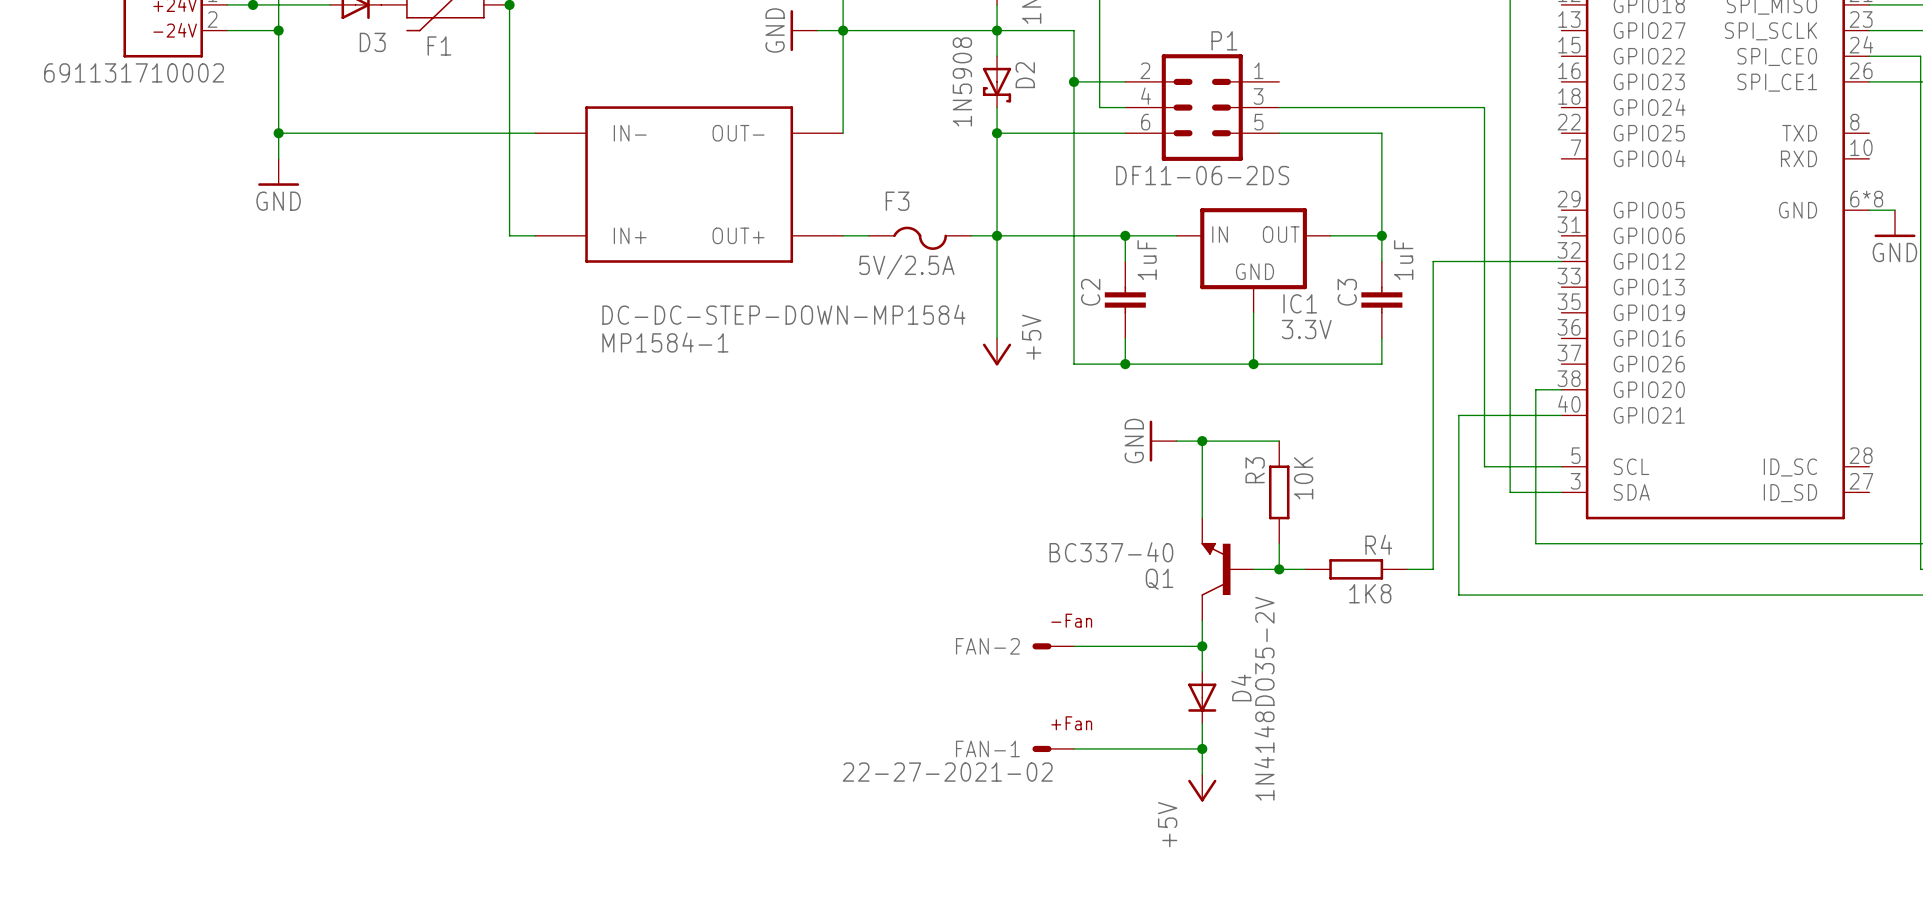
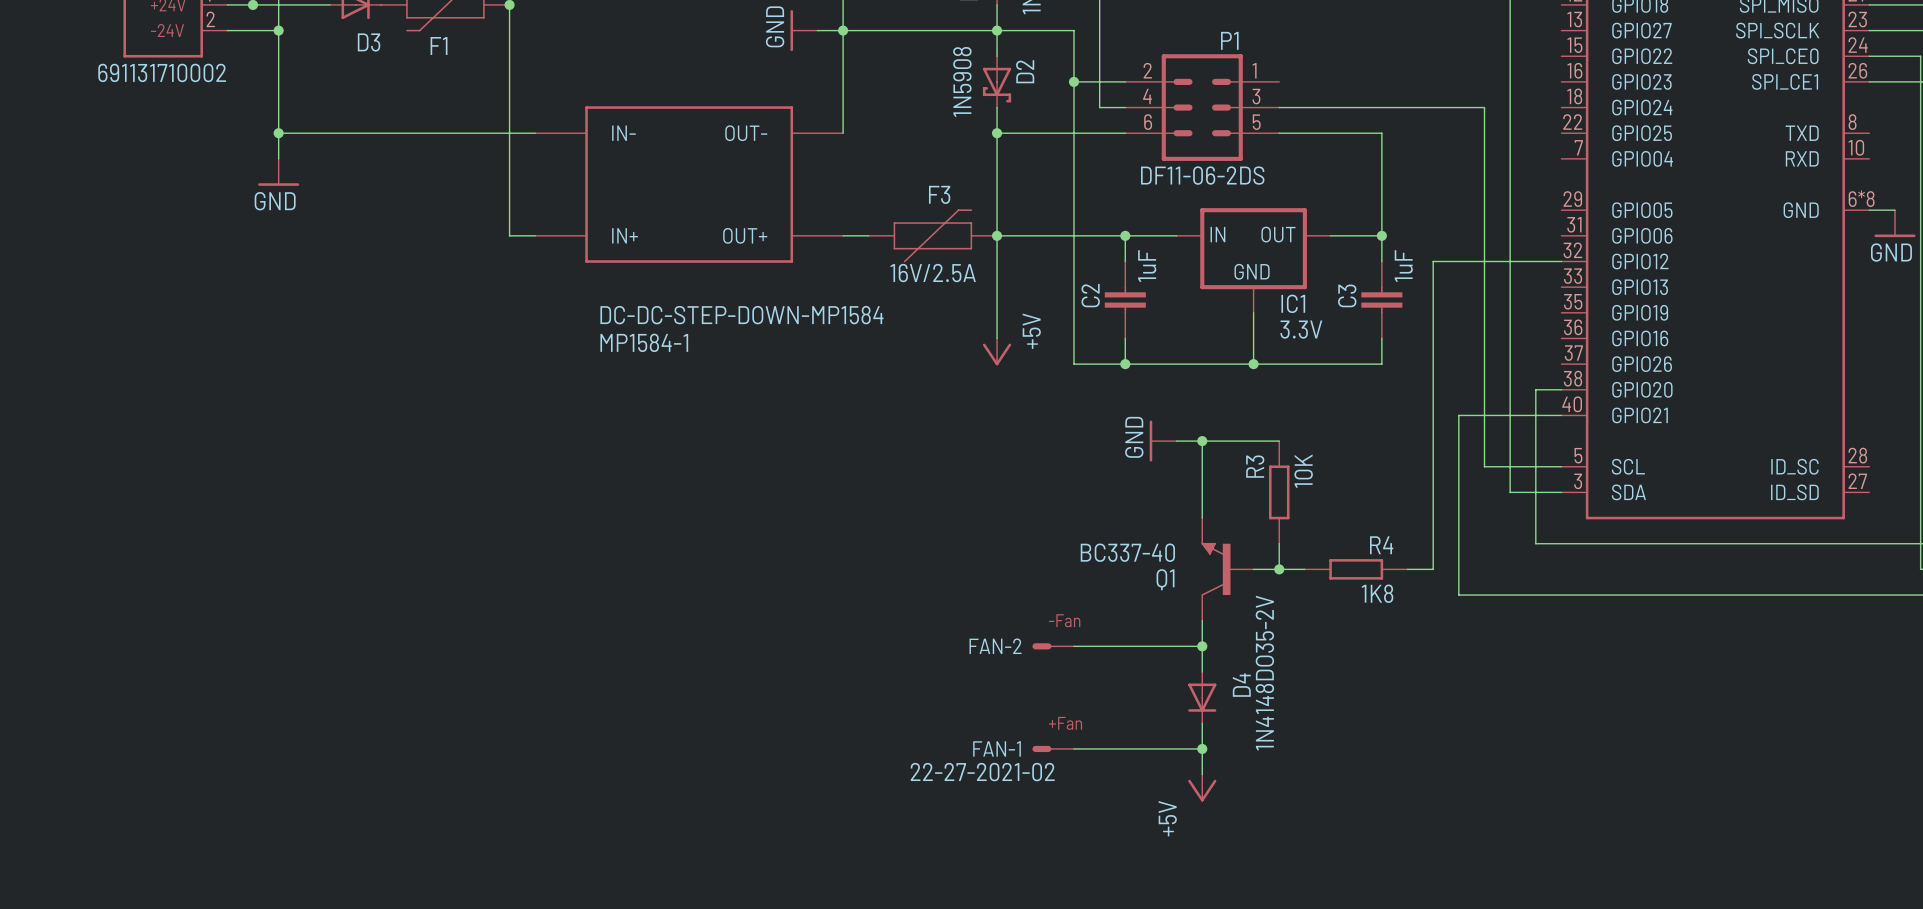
F3 name position: F3 (897, 201) -> F3 (939, 194)
F3 symbol: [868, 226, 972, 250] -> [868, 209, 998, 263]
F3 value: 5V/2.5A (906, 267) -> 16V/2.5A (933, 273)

